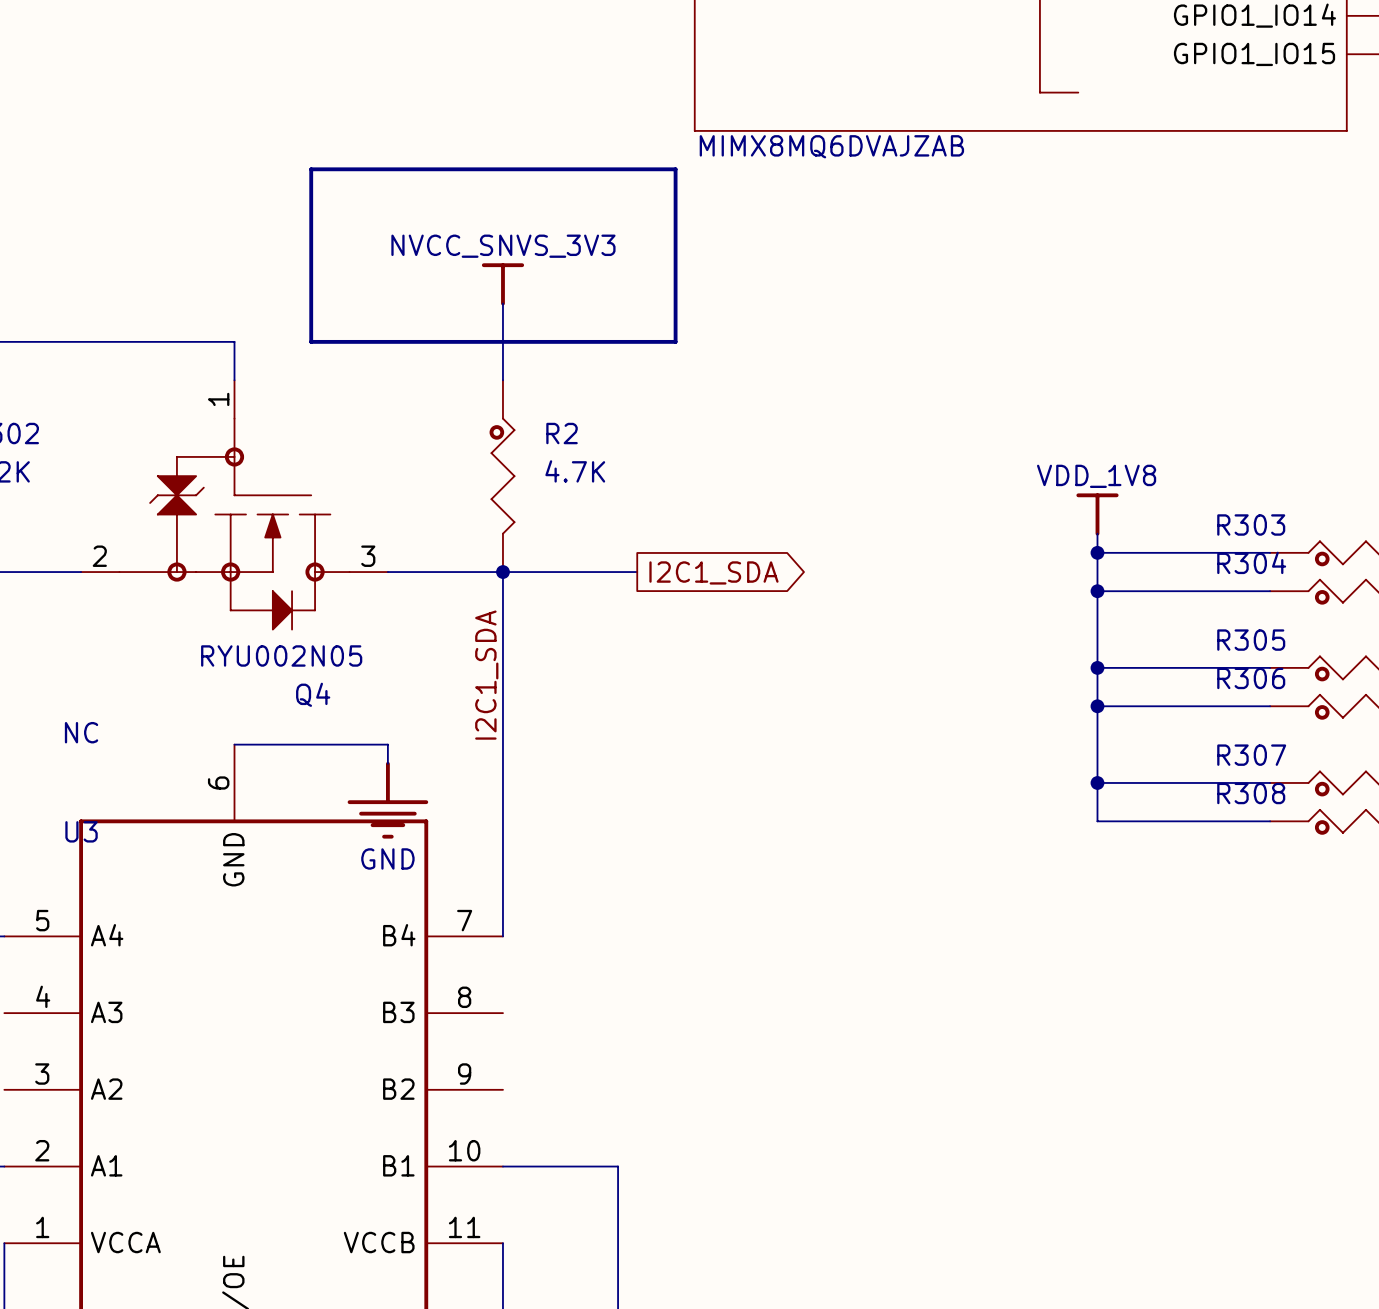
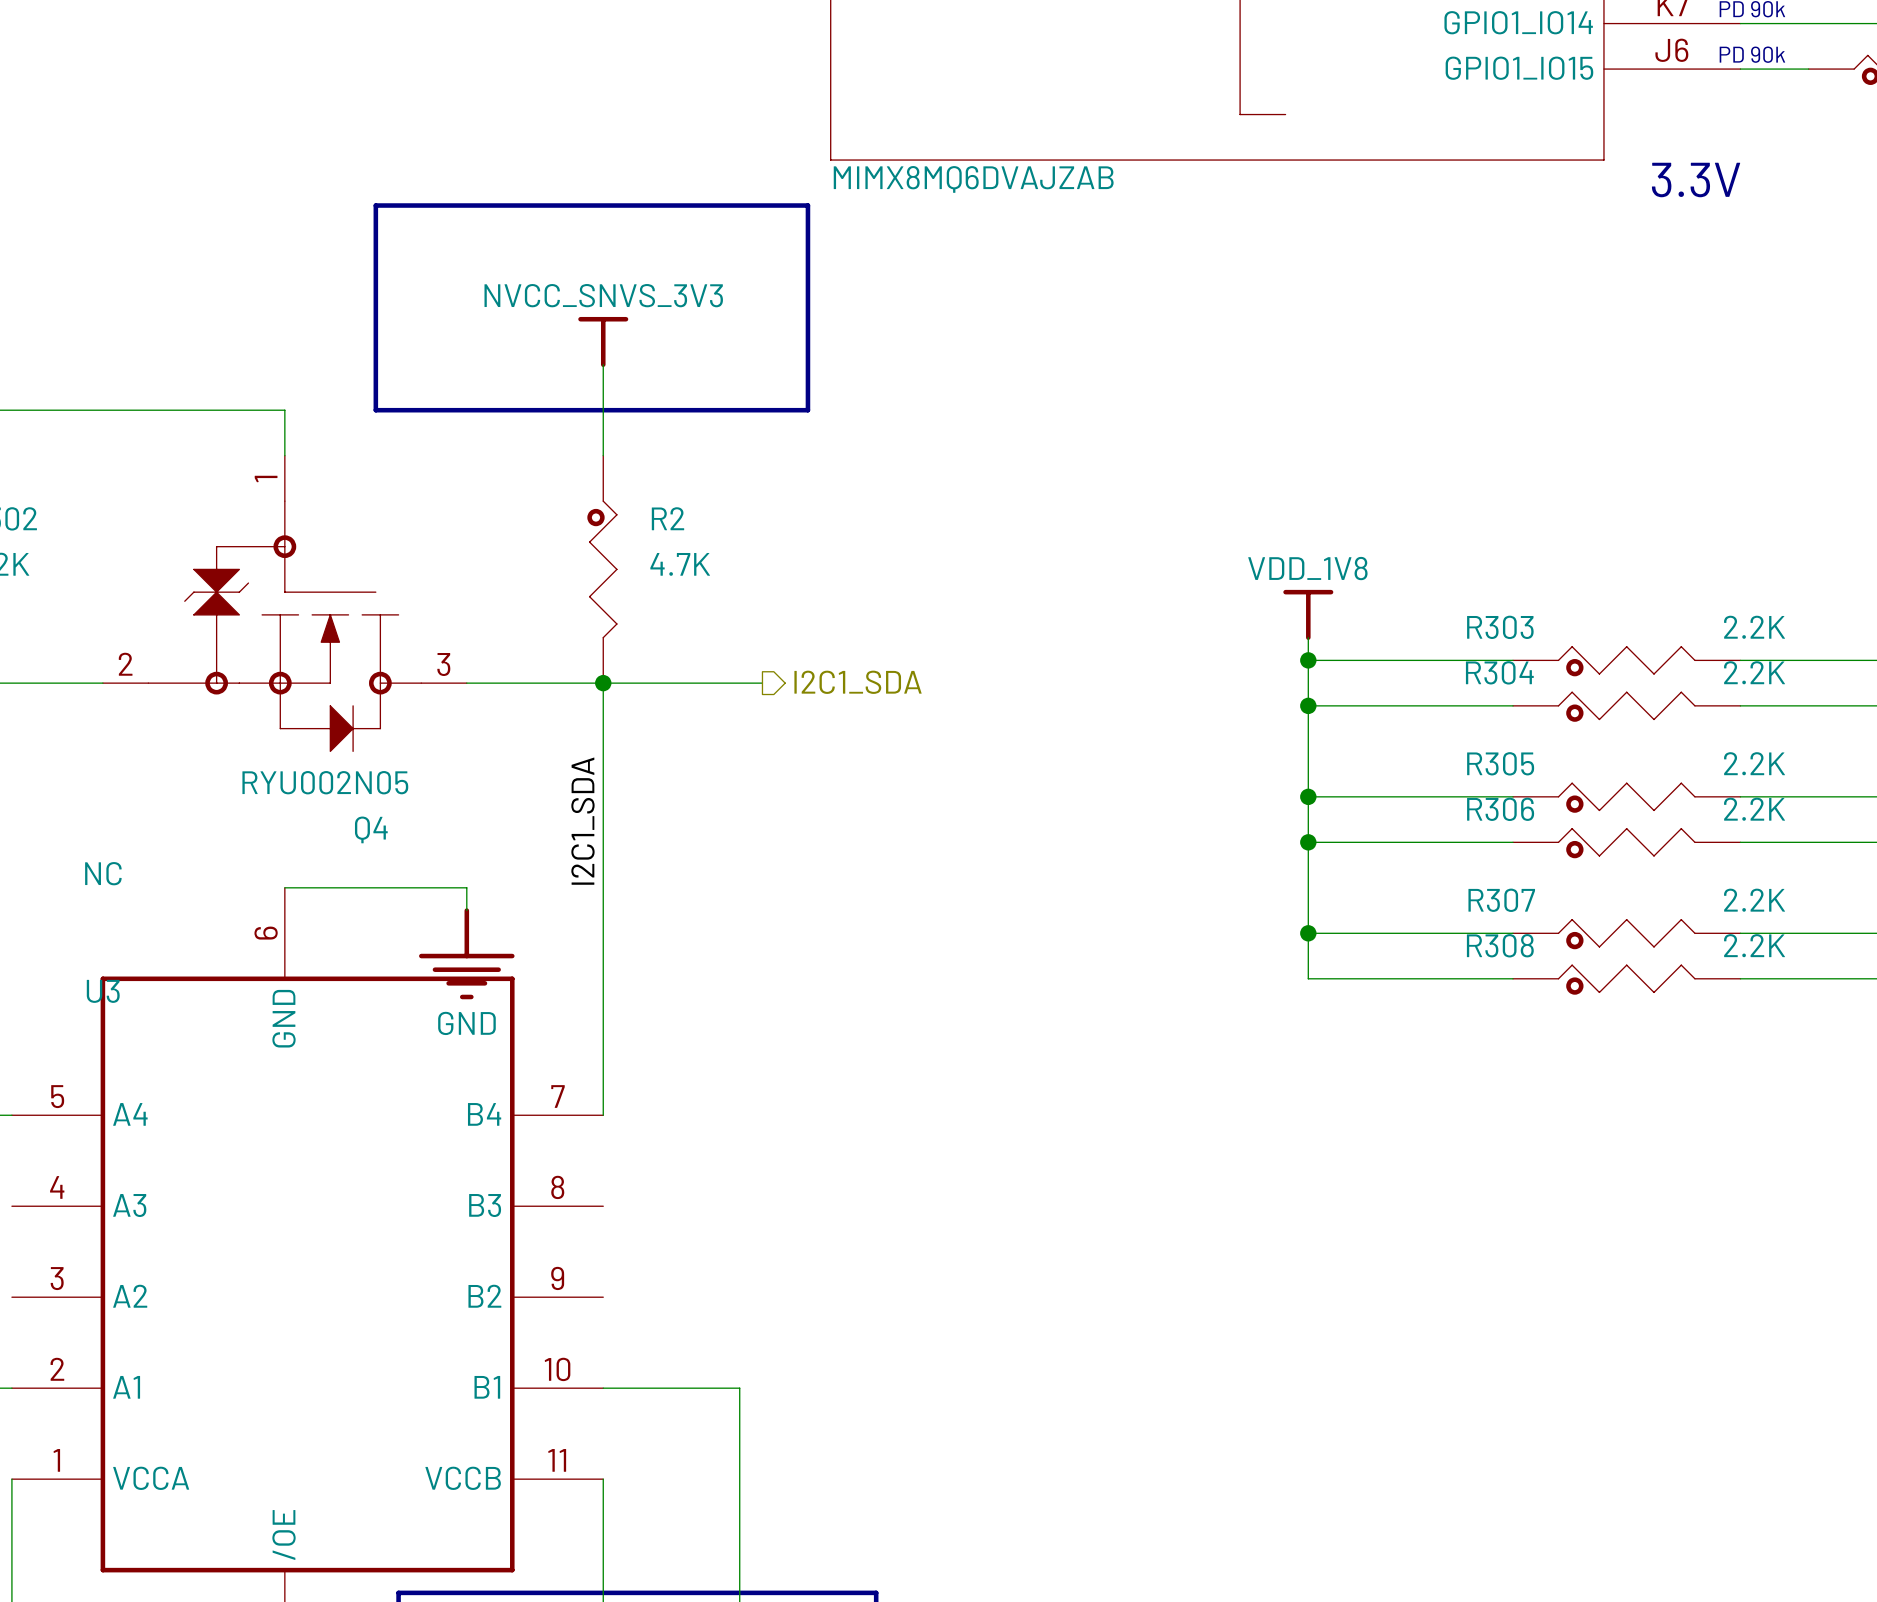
global label: I2C1_SDA (713, 572) -> none
hierarchical label: none -> I2C1_SDA (858, 682)

